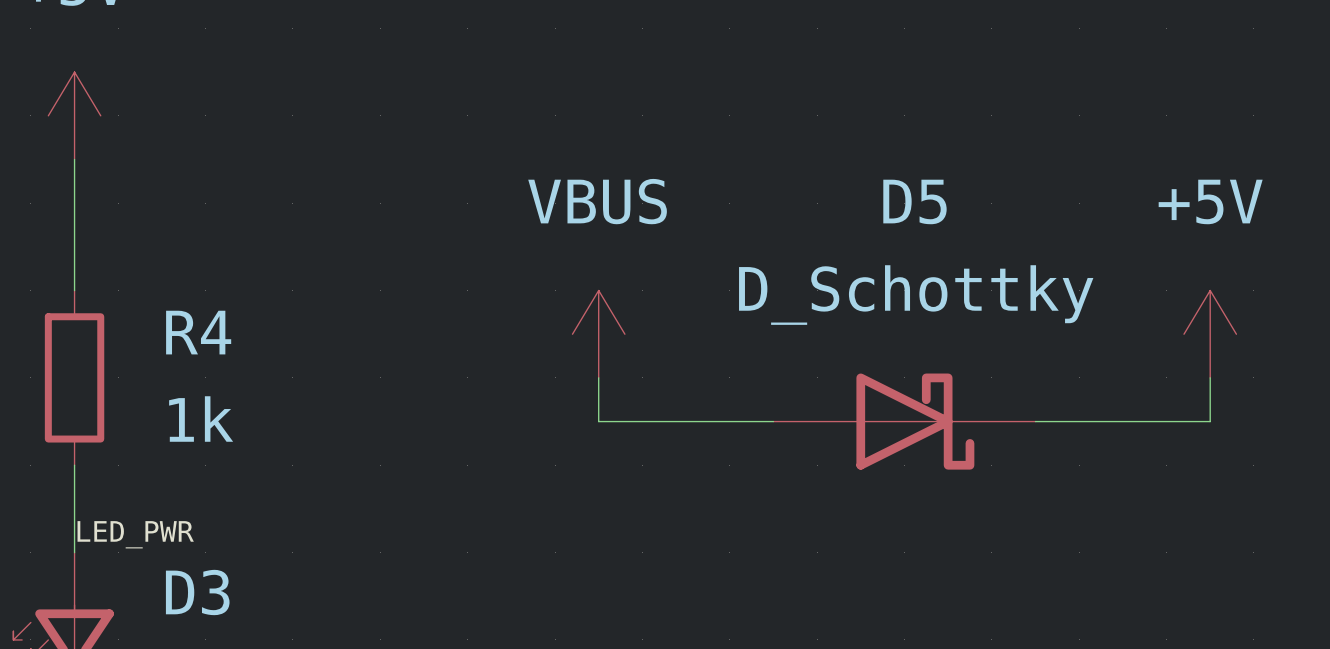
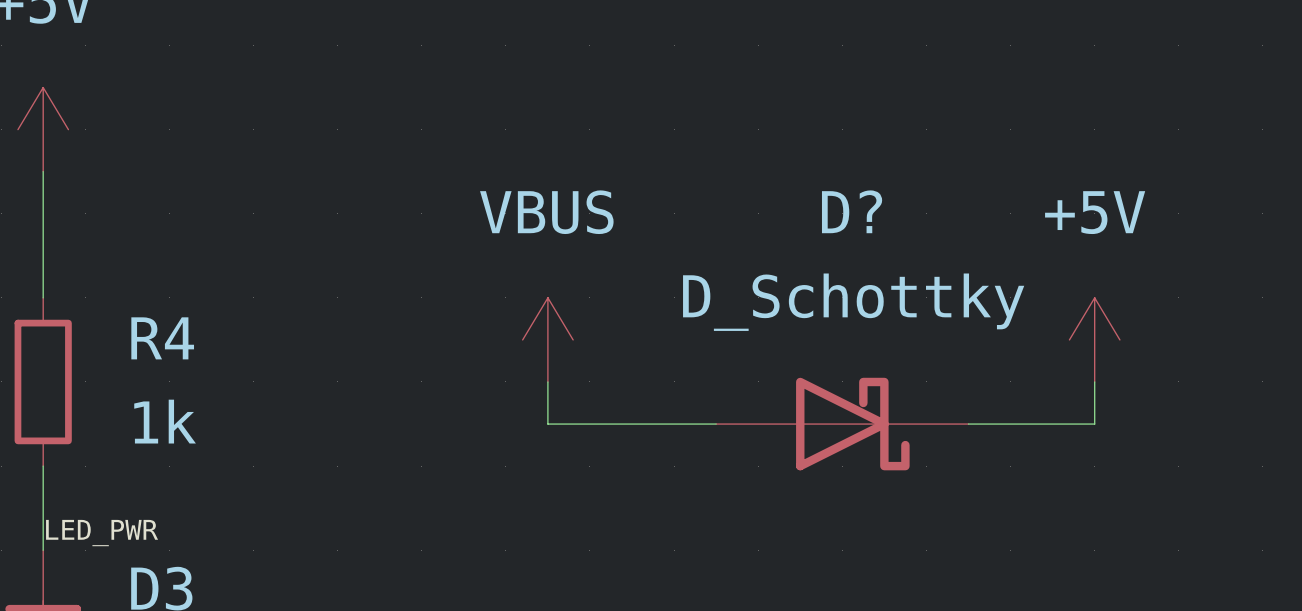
D5 name: D5 (914, 201) -> D? (852, 211)
power symbol position: +5V (1210, 334) -> +5V (1094, 339)
wire: (1210, 377) (1210, 421) (1166, 421) -> (1094, 381) (1094, 424)

